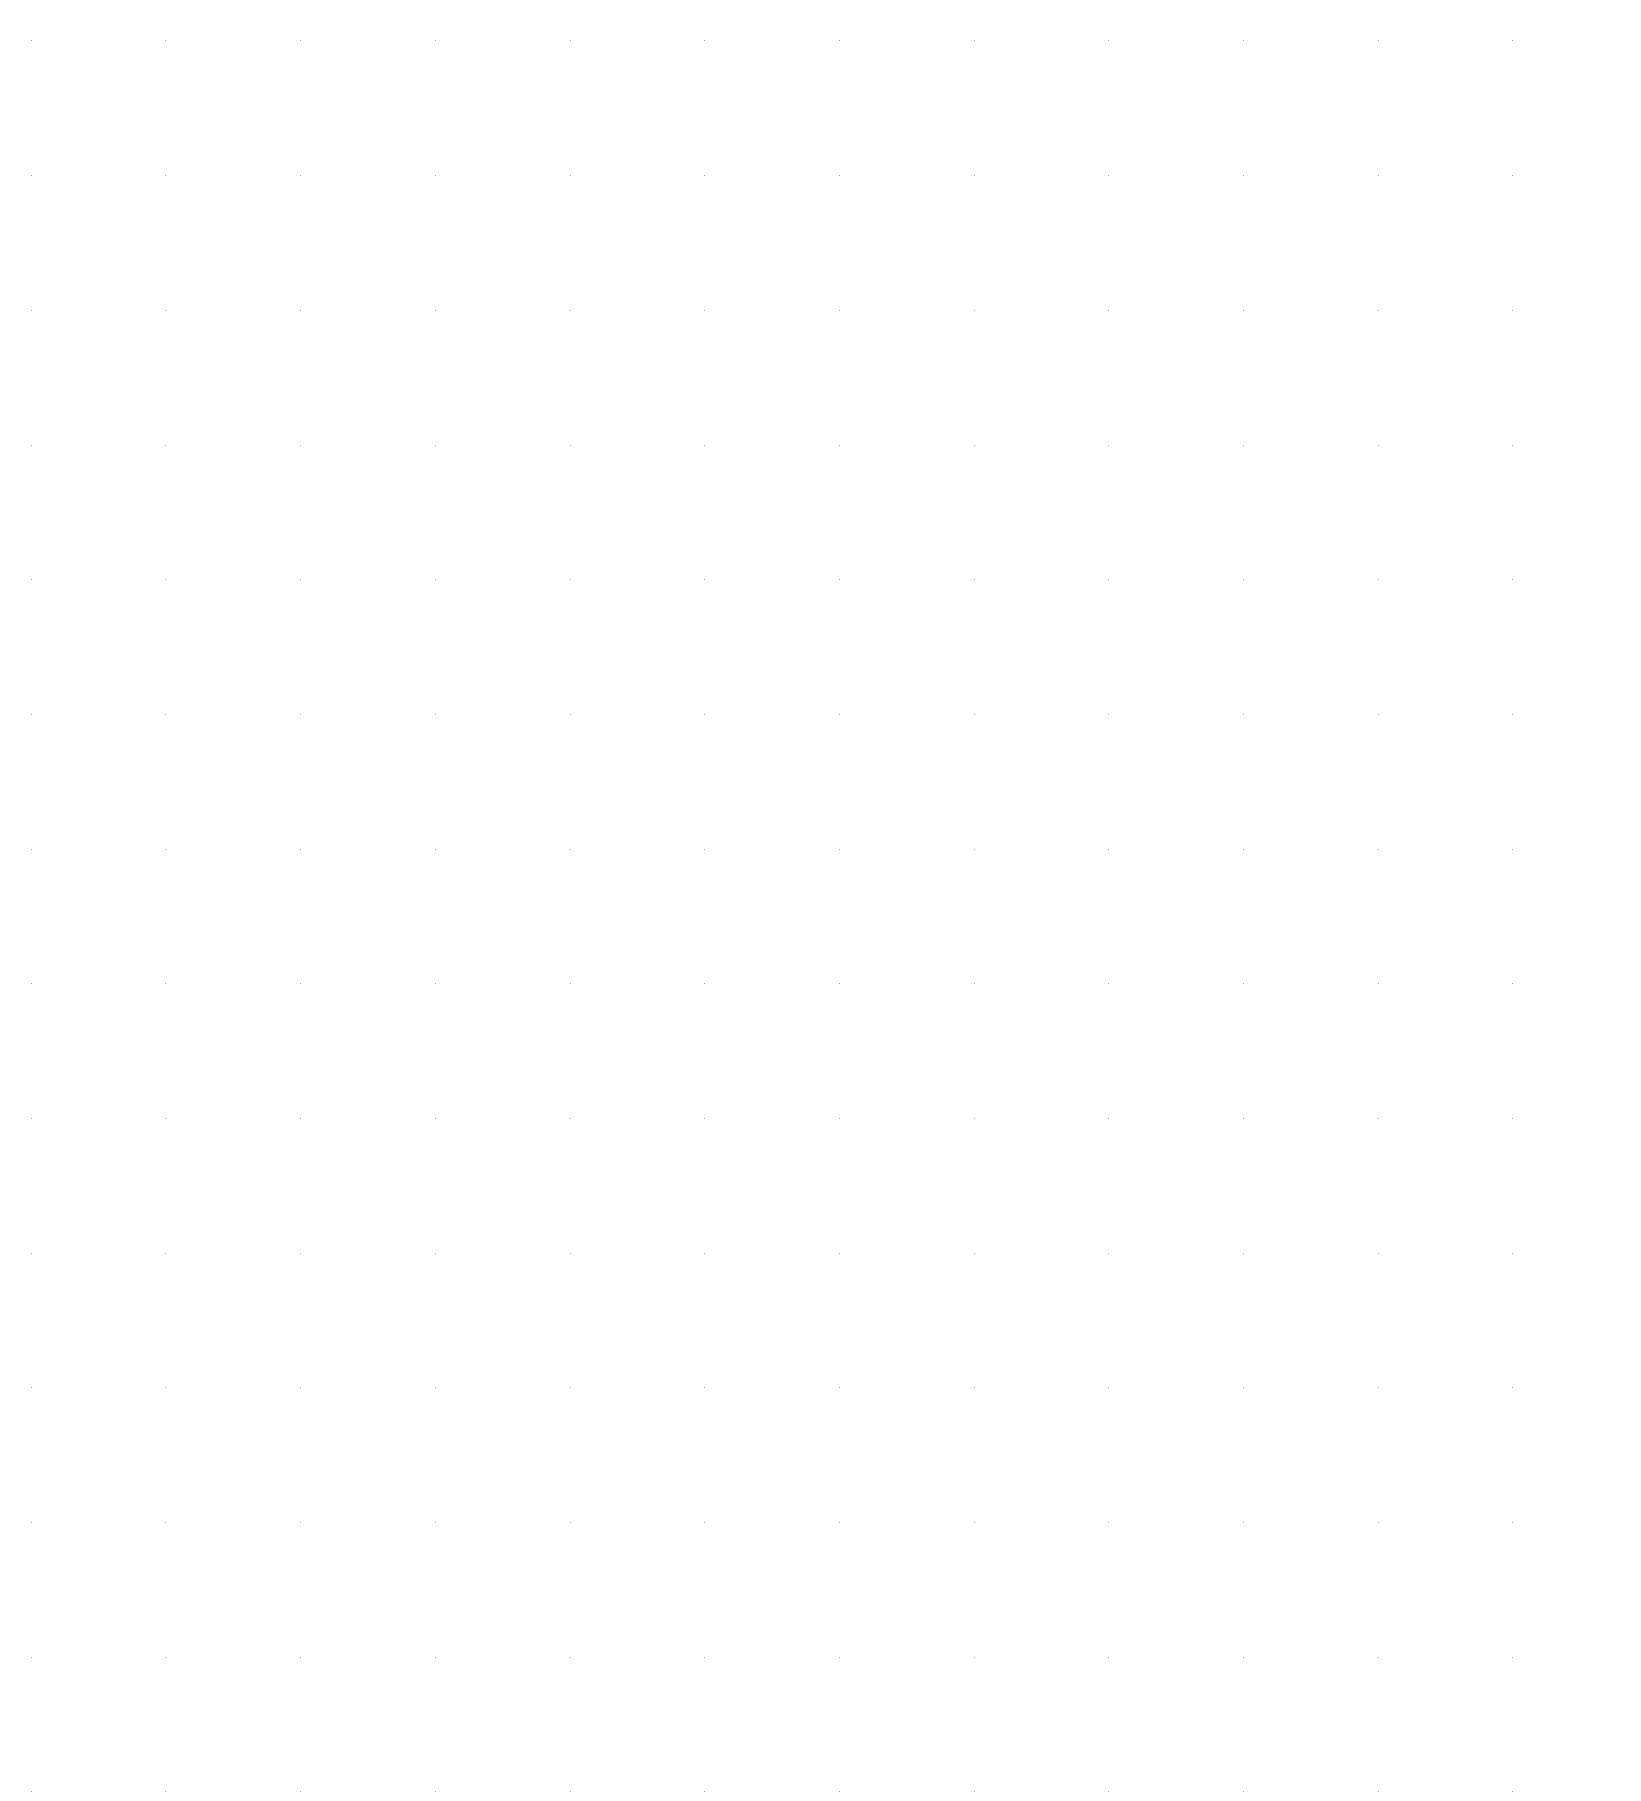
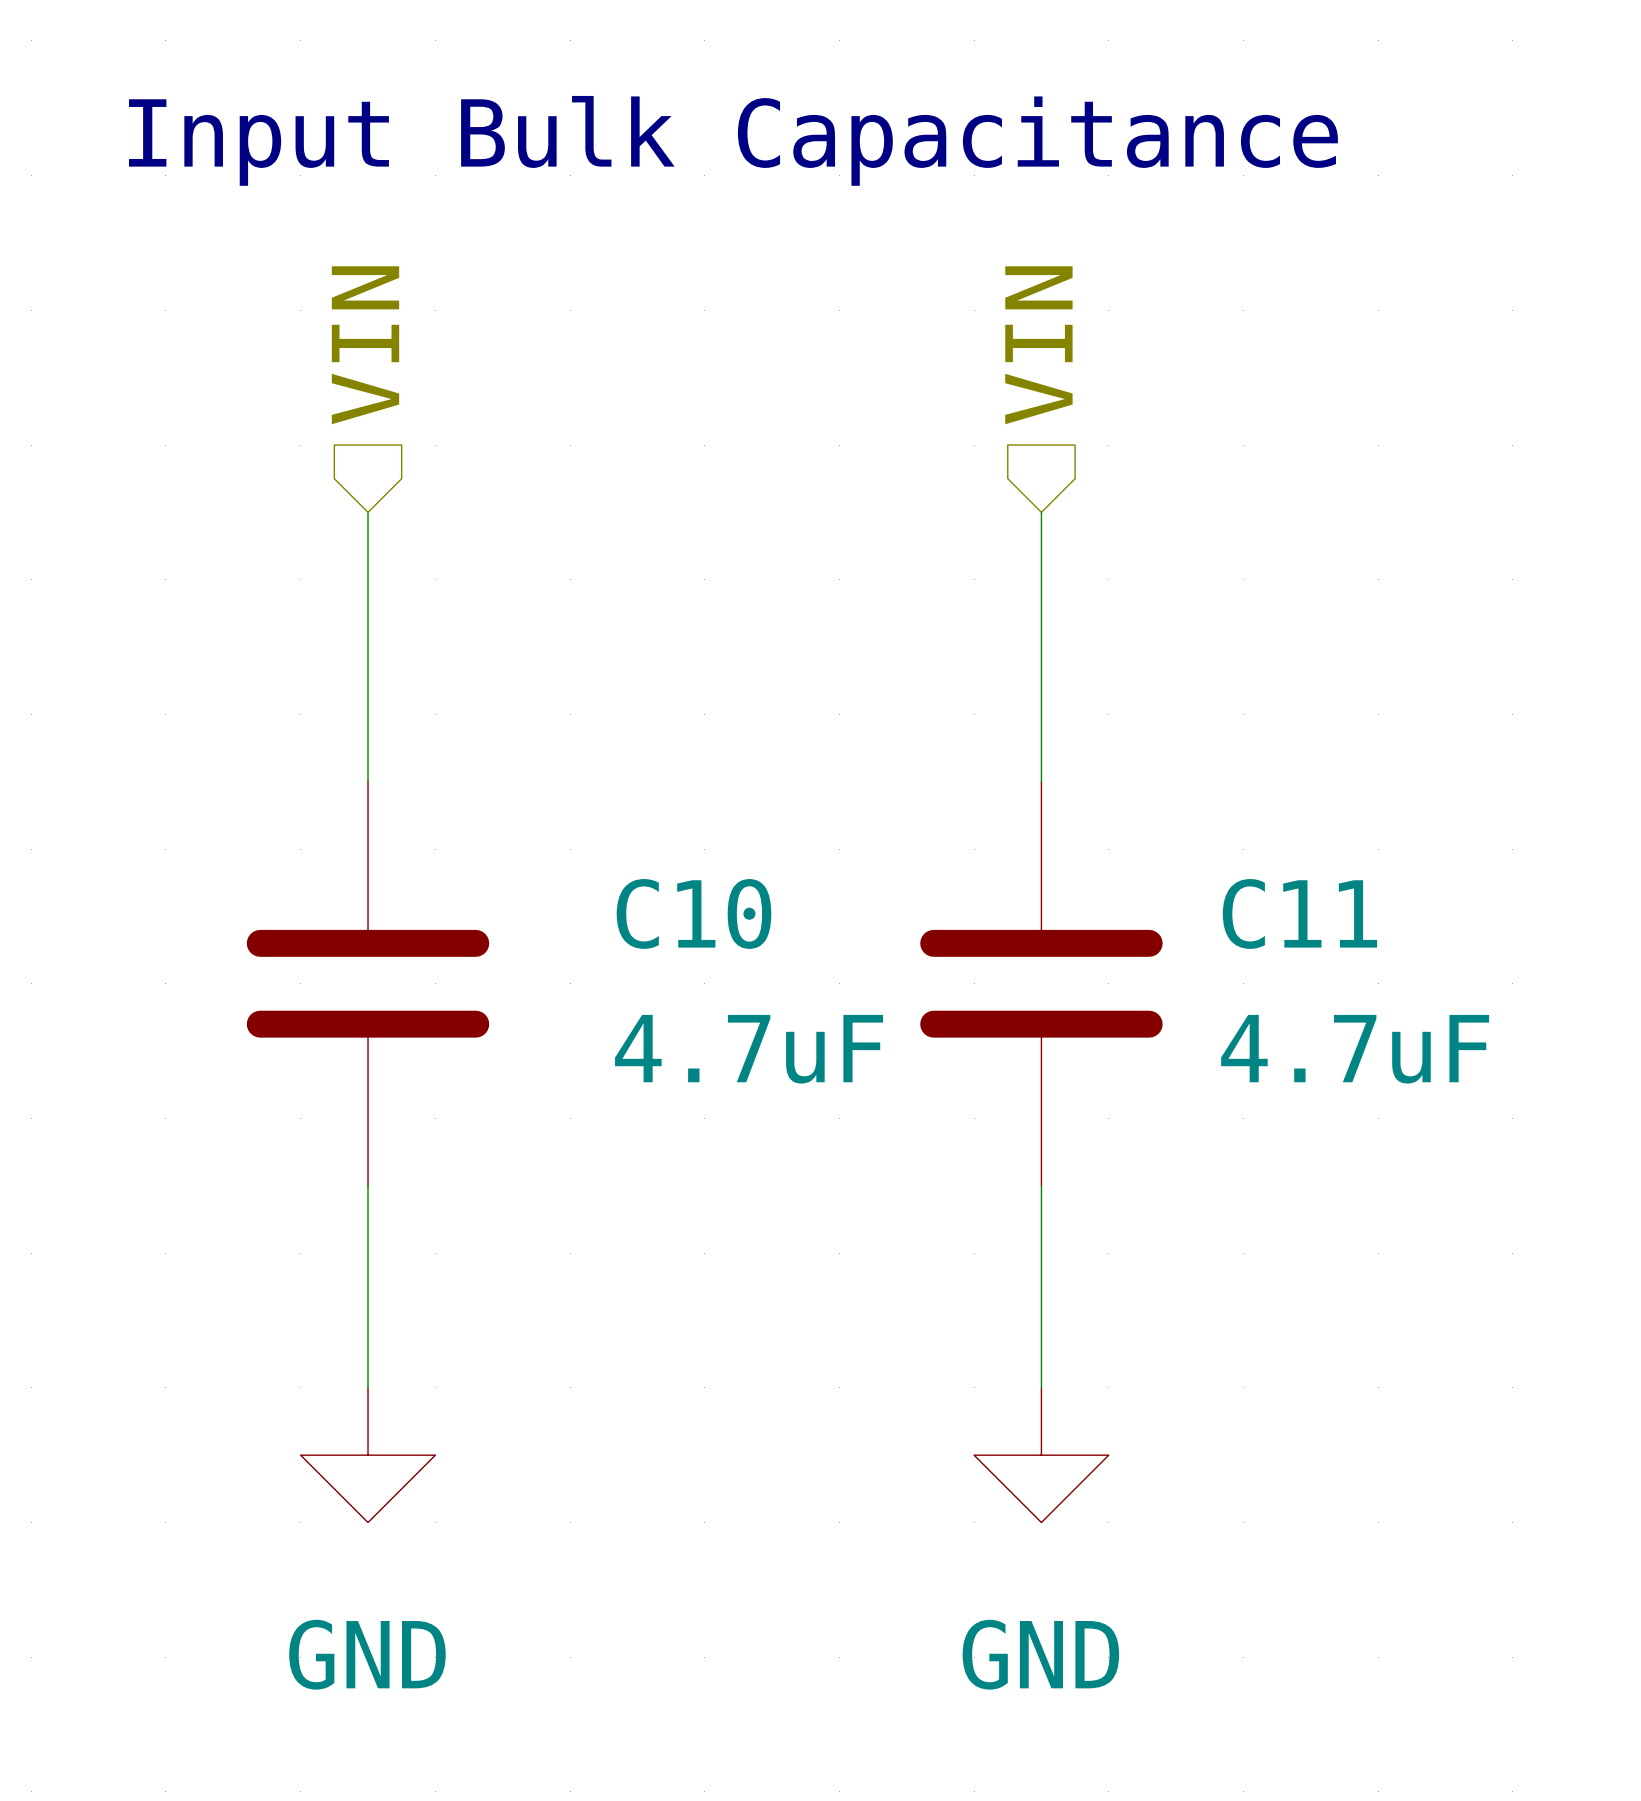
text: none -> Input Bulk Capacitance (733, 140)
hierarchical label: none -> VIN (365, 345)
hierarchical label: none -> VIN (1038, 345)
wire: none -> (368, 512) (368, 781)
wire: none -> (1041, 512) (1041, 781)
C10: none -> 4.7uF (368, 983)
C11: none -> 4.7uF (1041, 983)
wire: none -> (368, 1185) (368, 1387)
wire: none -> (1041, 1185) (1041, 1387)
power symbol: none -> GND (368, 1455)
power symbol: none -> GND (1041, 1455)

